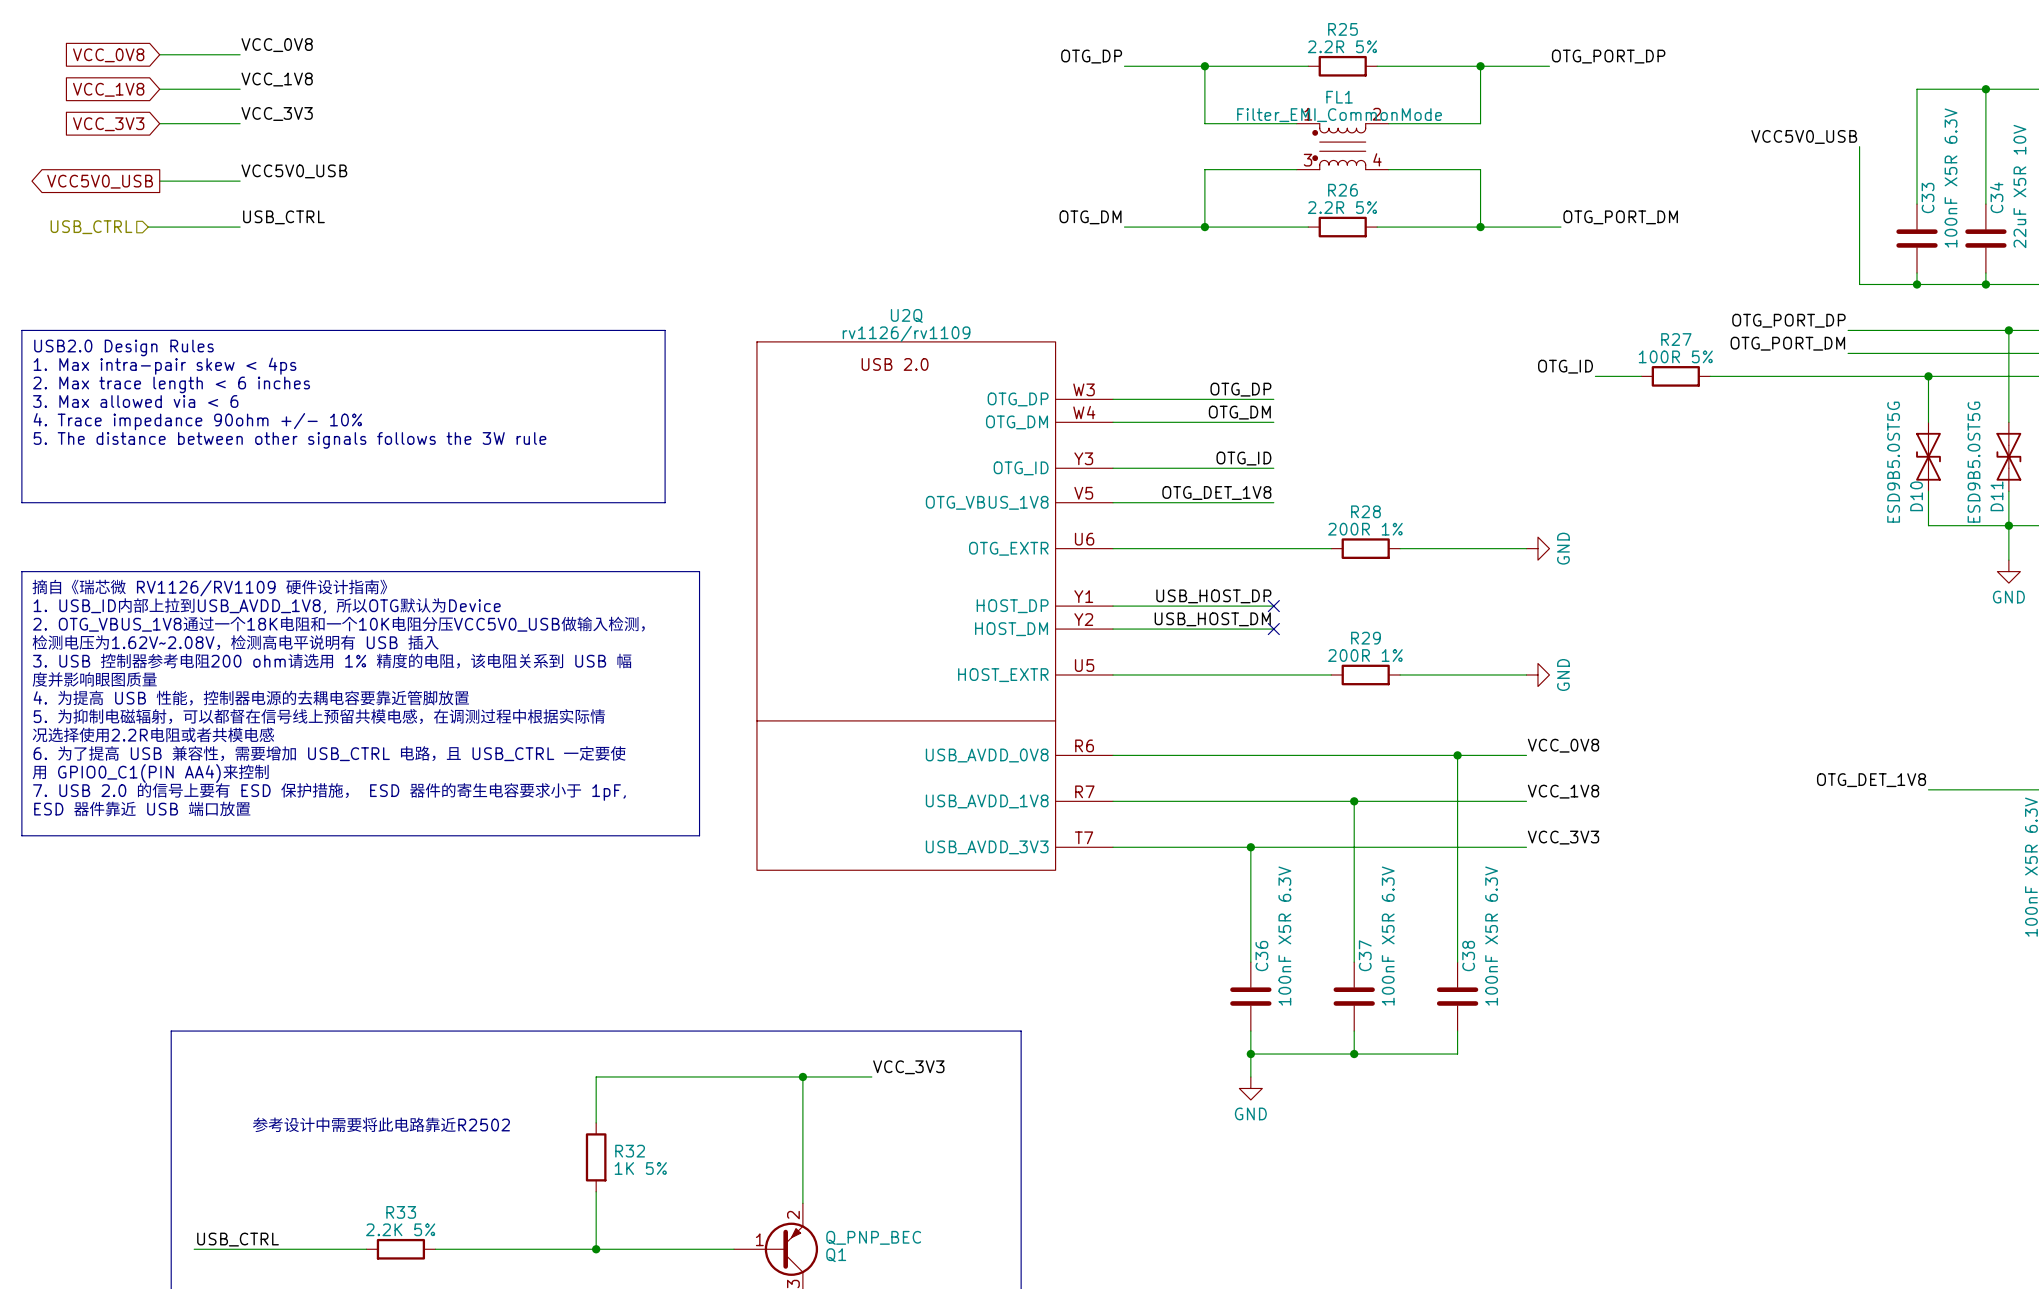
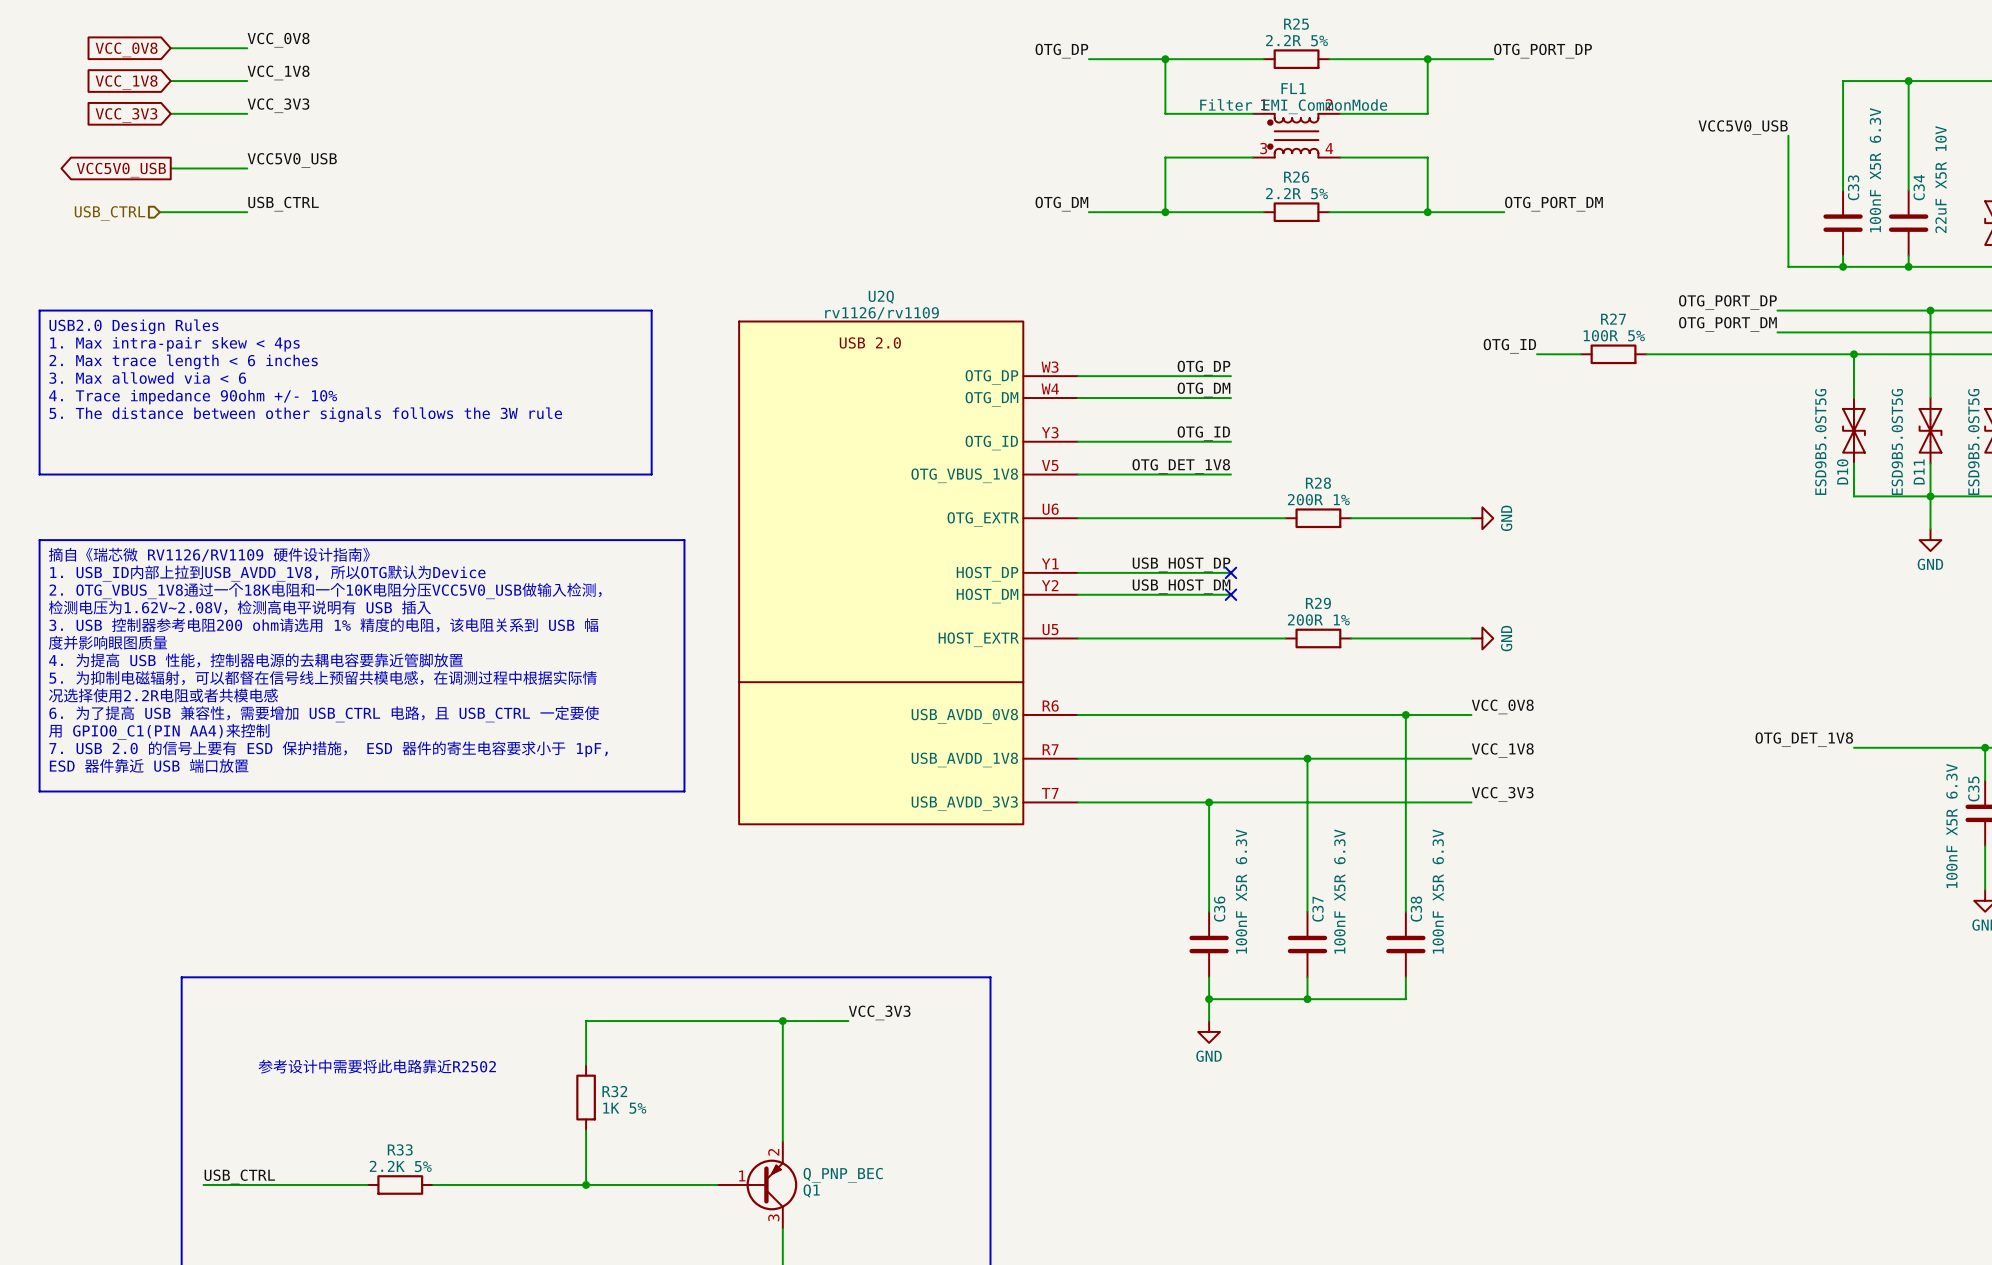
U2Q symbol: [756, 341, 1114, 871] -> [739, 321, 1078, 825]

